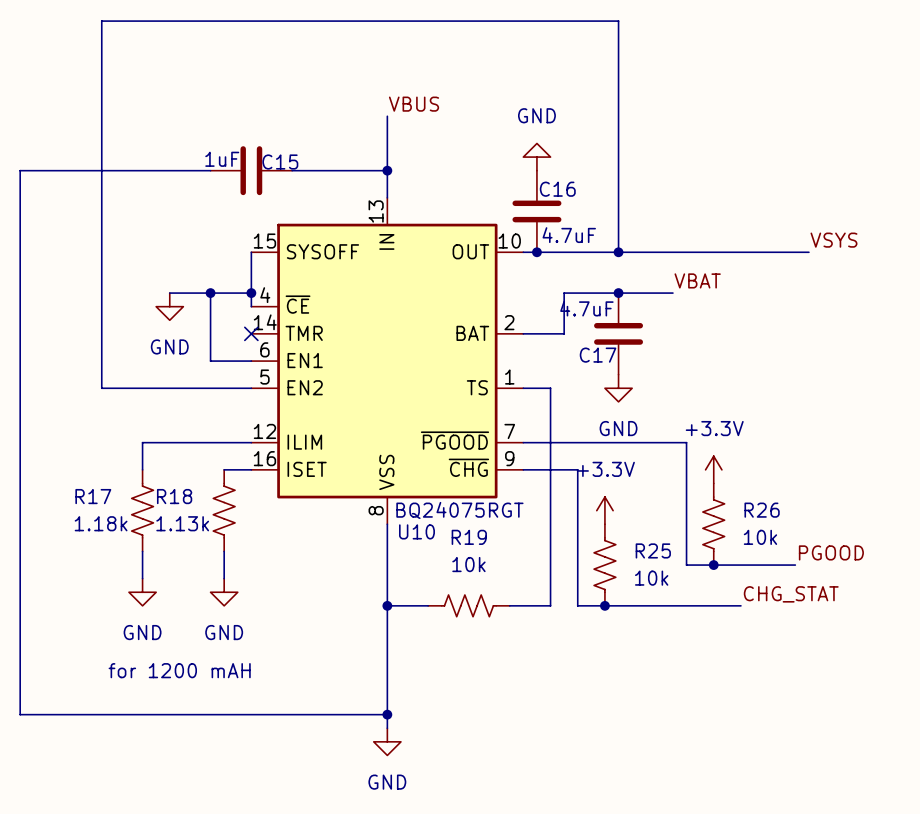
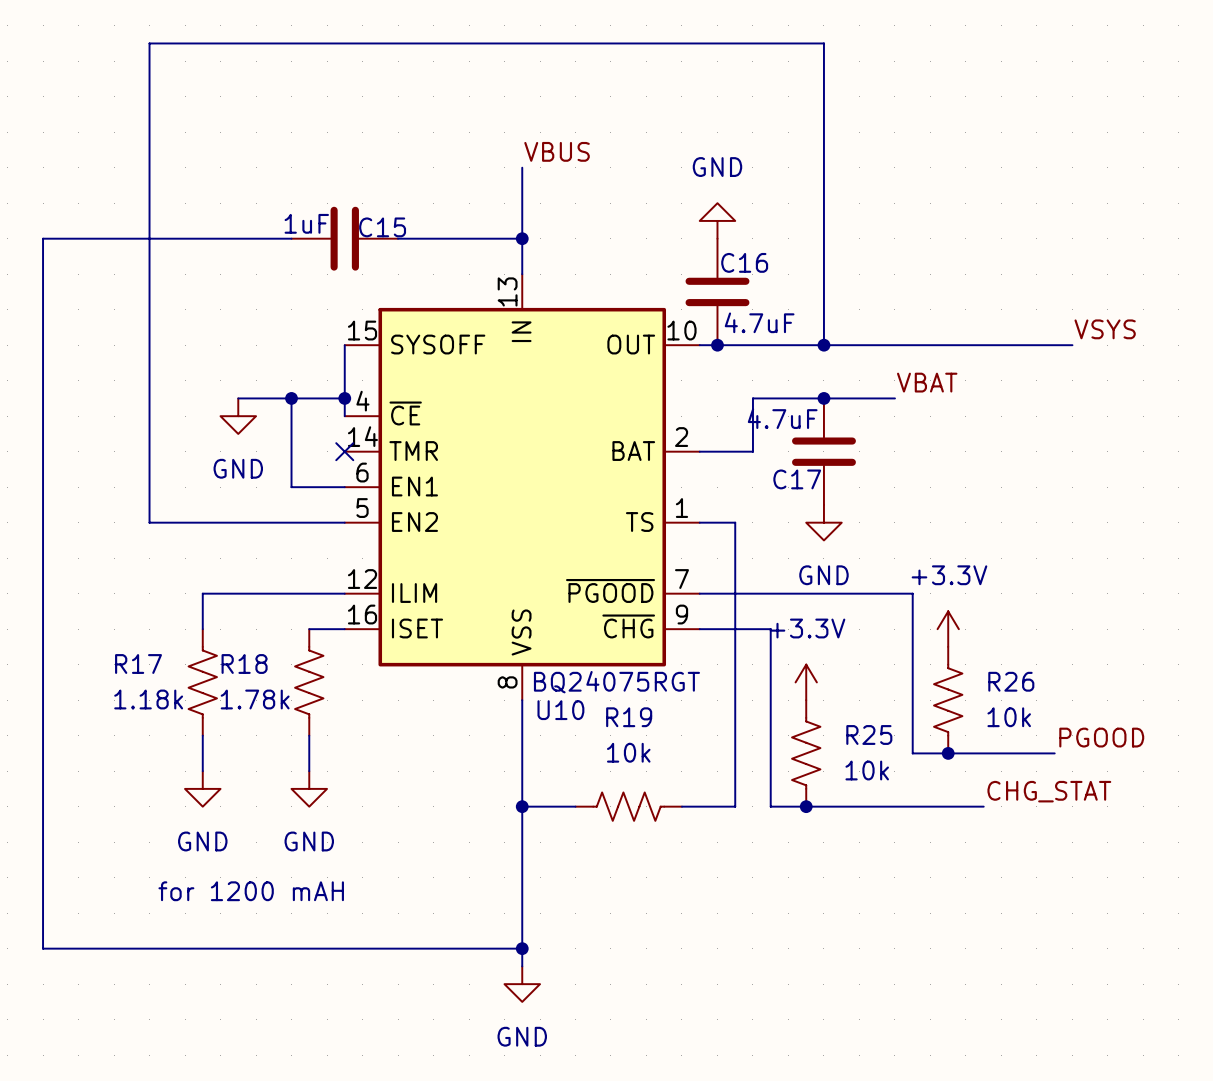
R18 value: 1.13k (182, 523) -> 1.78k (255, 699)

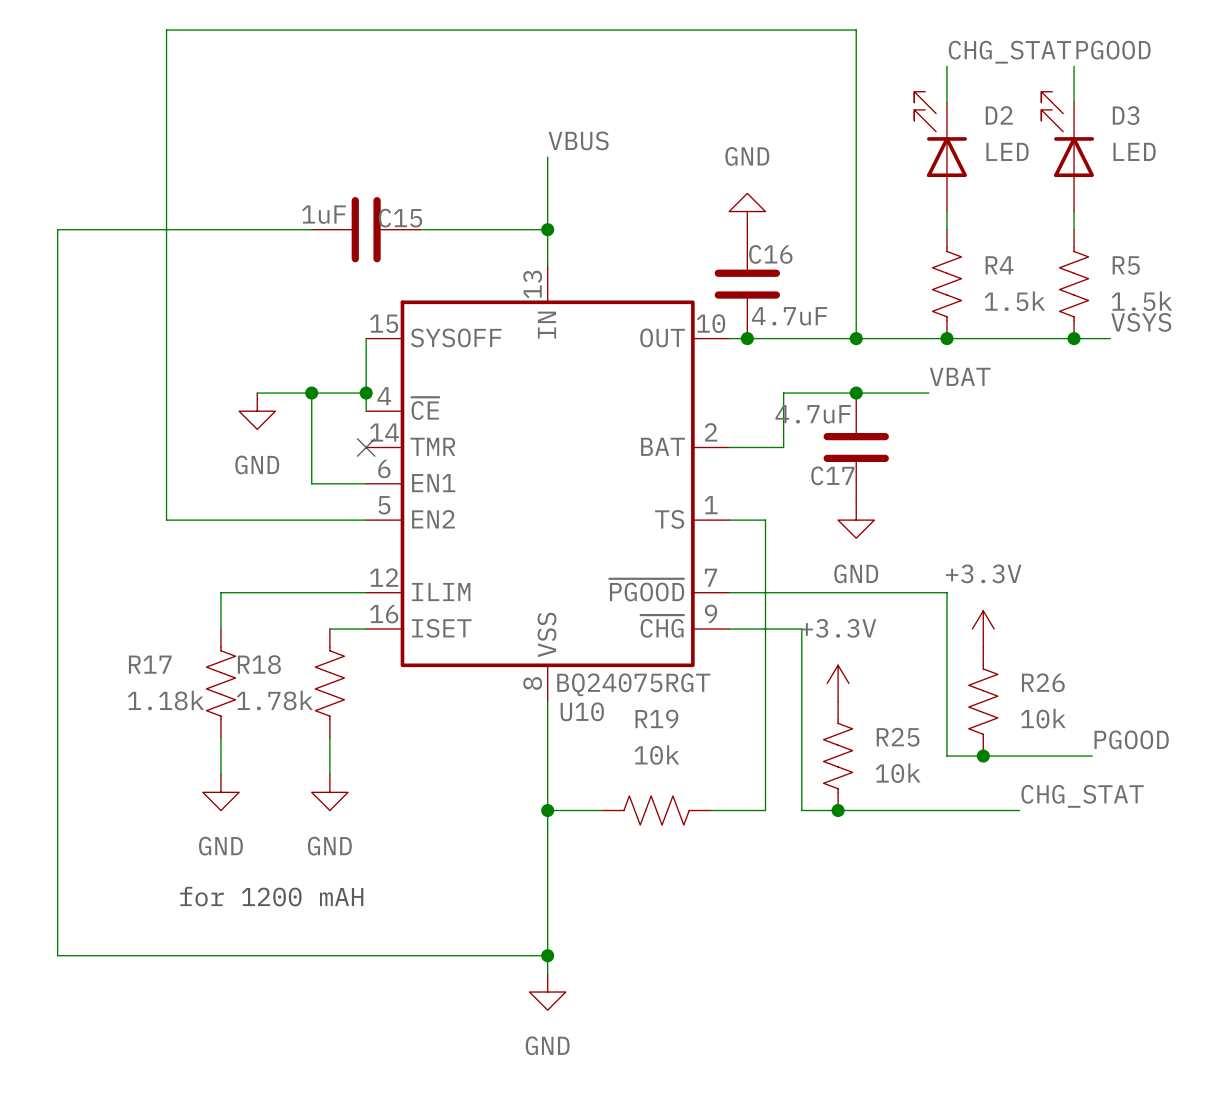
label: none -> CHG_STAT (1009, 52)
label: none -> PGOOD (1113, 50)
wire: none -> (946, 66) (946, 102)
wire: none -> (1074, 66) (1074, 102)
D2: none -> LED (940, 151)
D3: none -> LED (1067, 151)
wire: none -> (946, 211) (946, 229)
wire: none -> (1074, 211) (1074, 229)
R4: none -> 1.5k (946, 284)
R5: none -> 1.5k (1074, 284)
junction: none -> (946, 338)
junction: none -> (1074, 338)

